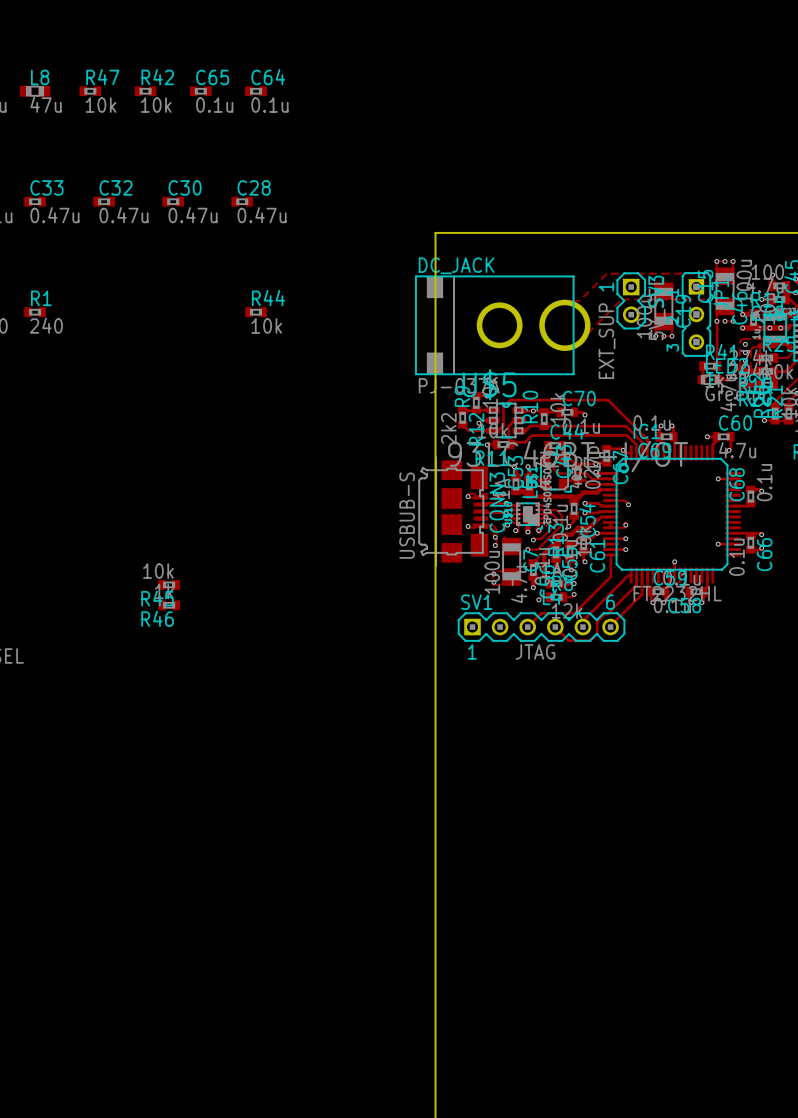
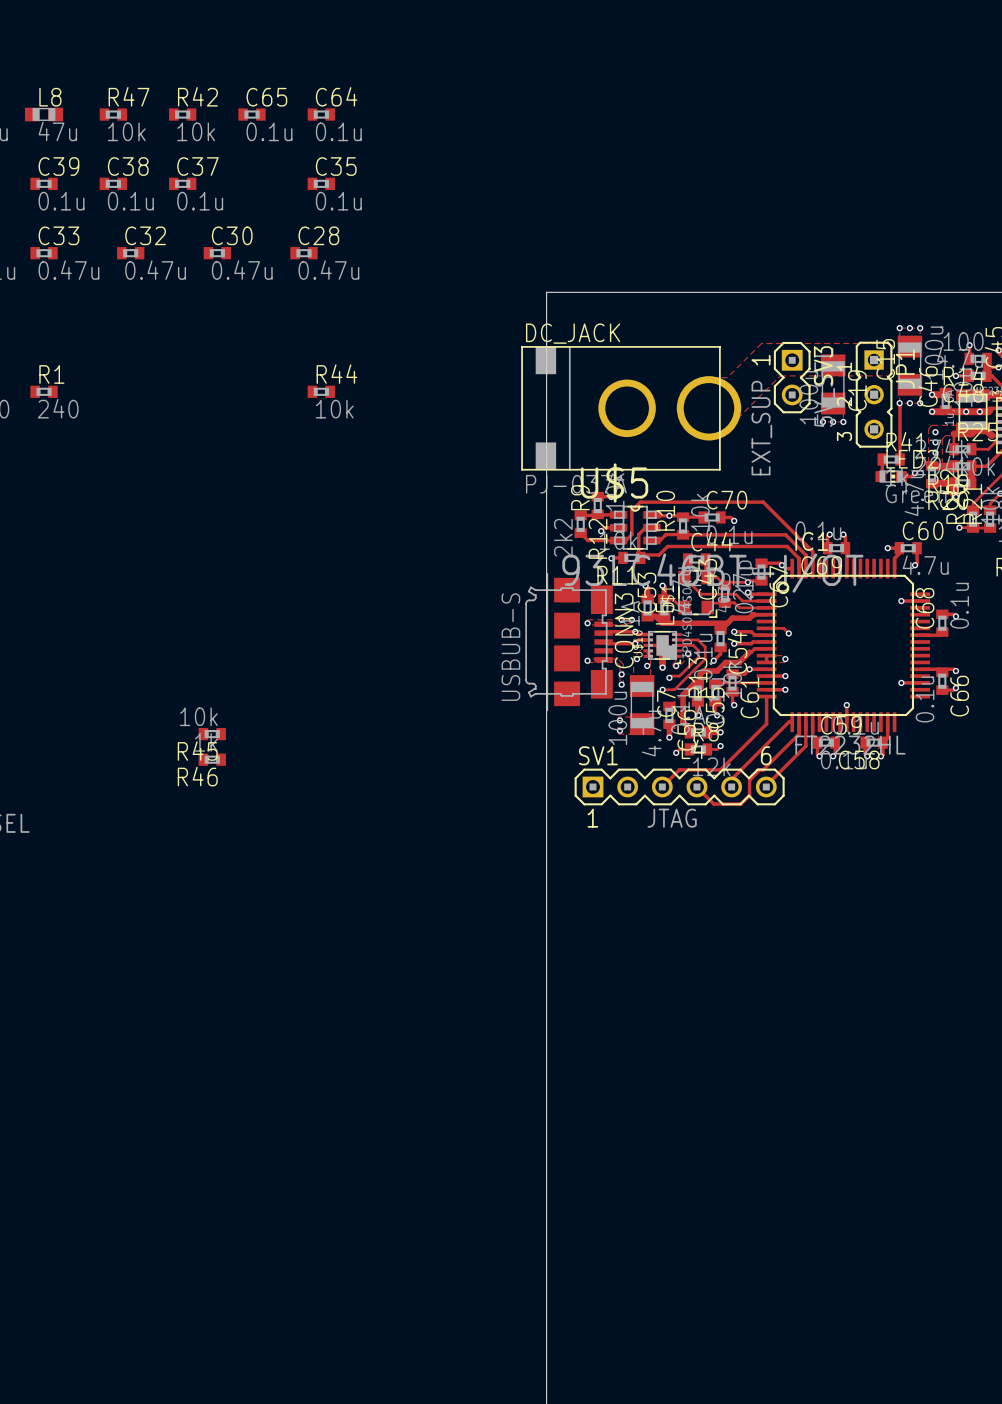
C39: none -> 0.1u (44, 183)
C38: none -> 0.1u (113, 183)
C37: none -> 0.1u (182, 183)
C35: none -> 0.1u (321, 183)

